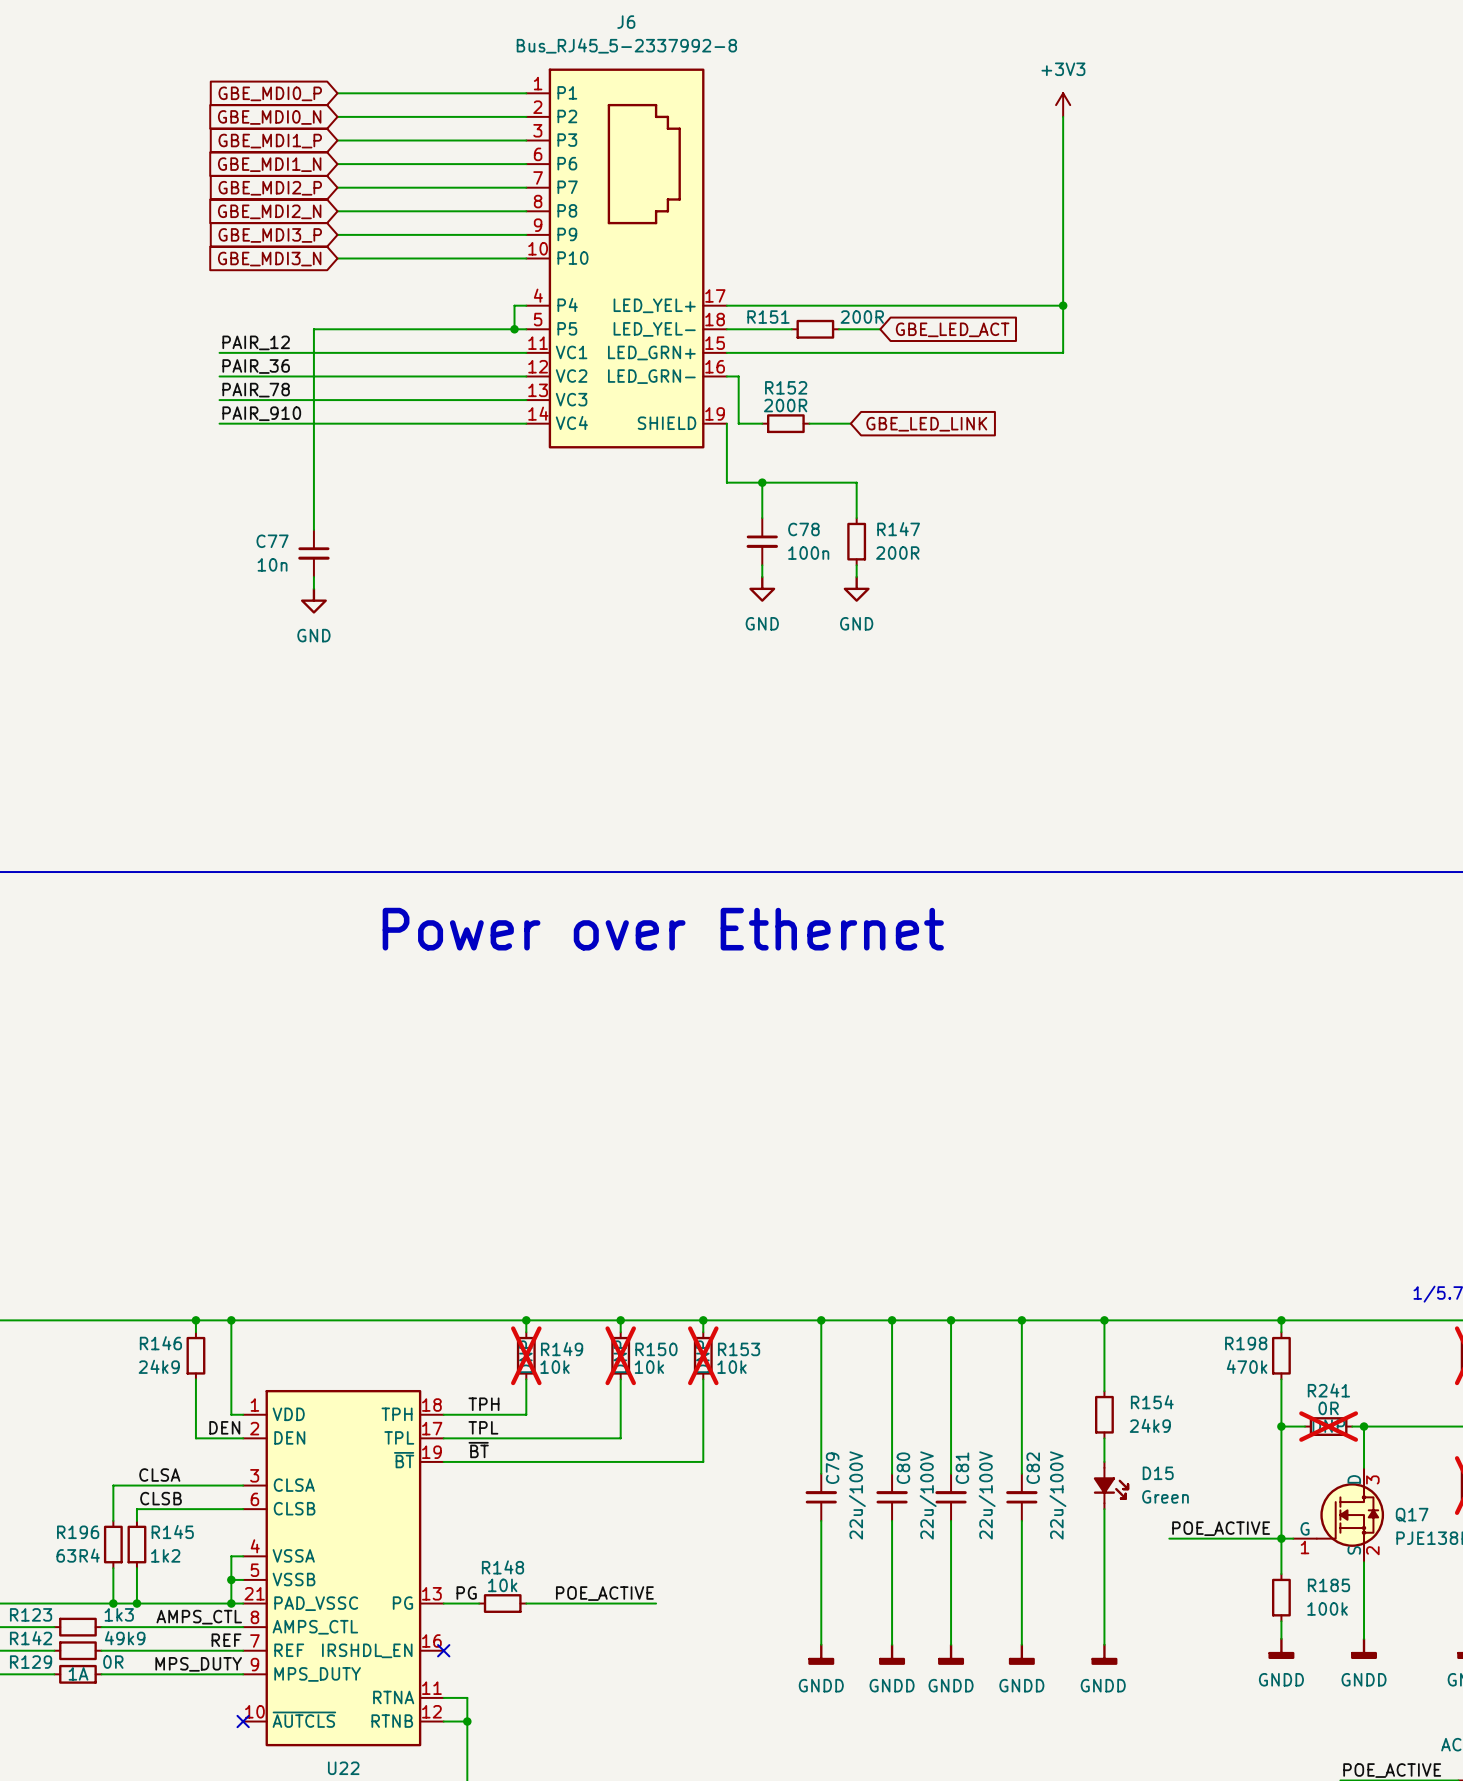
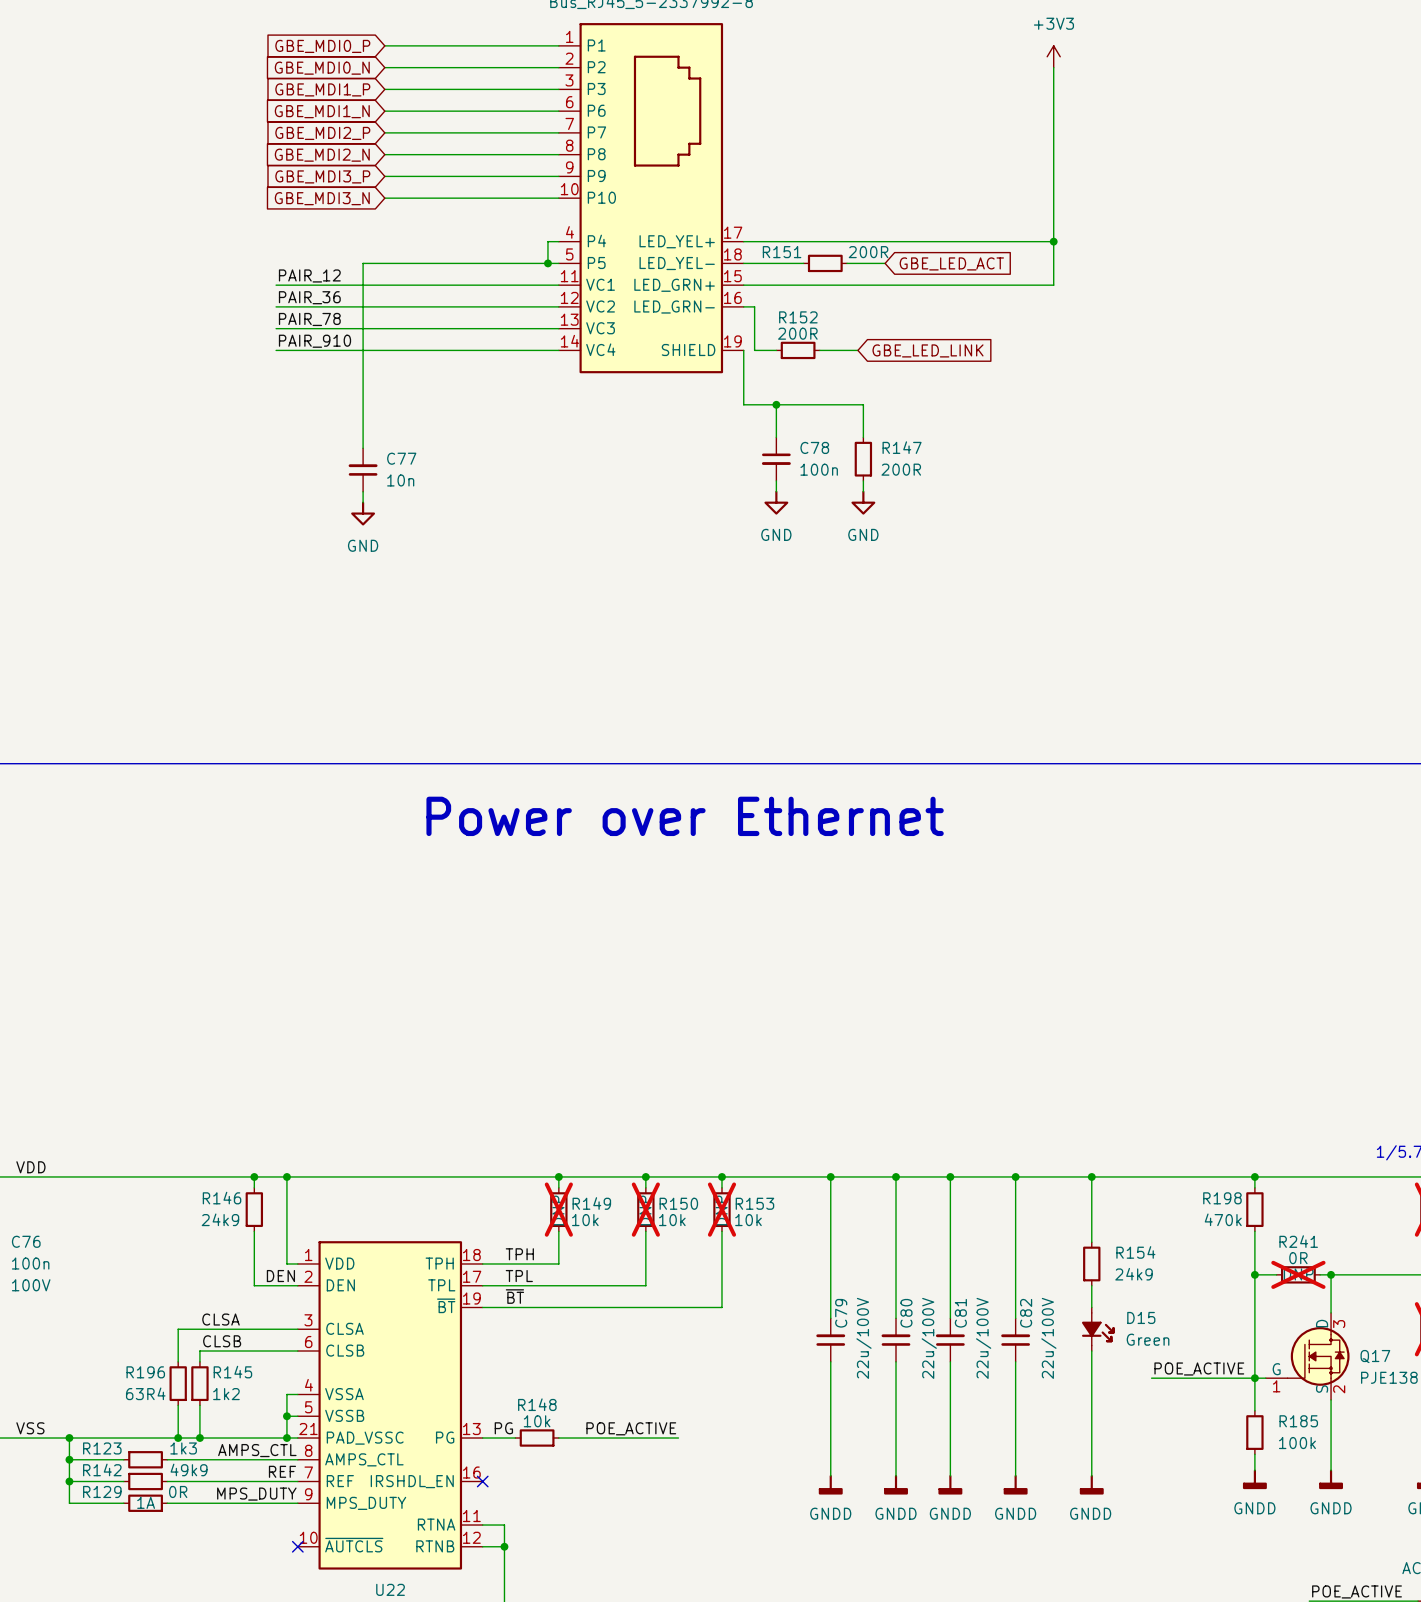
C77 name position: C77 (272, 541) -> C77 (401, 458)
C77 rotation: 0° (313, 553) -> 180° (363, 469)
C77 text position: 10n (272, 564) -> 10n (400, 480)

